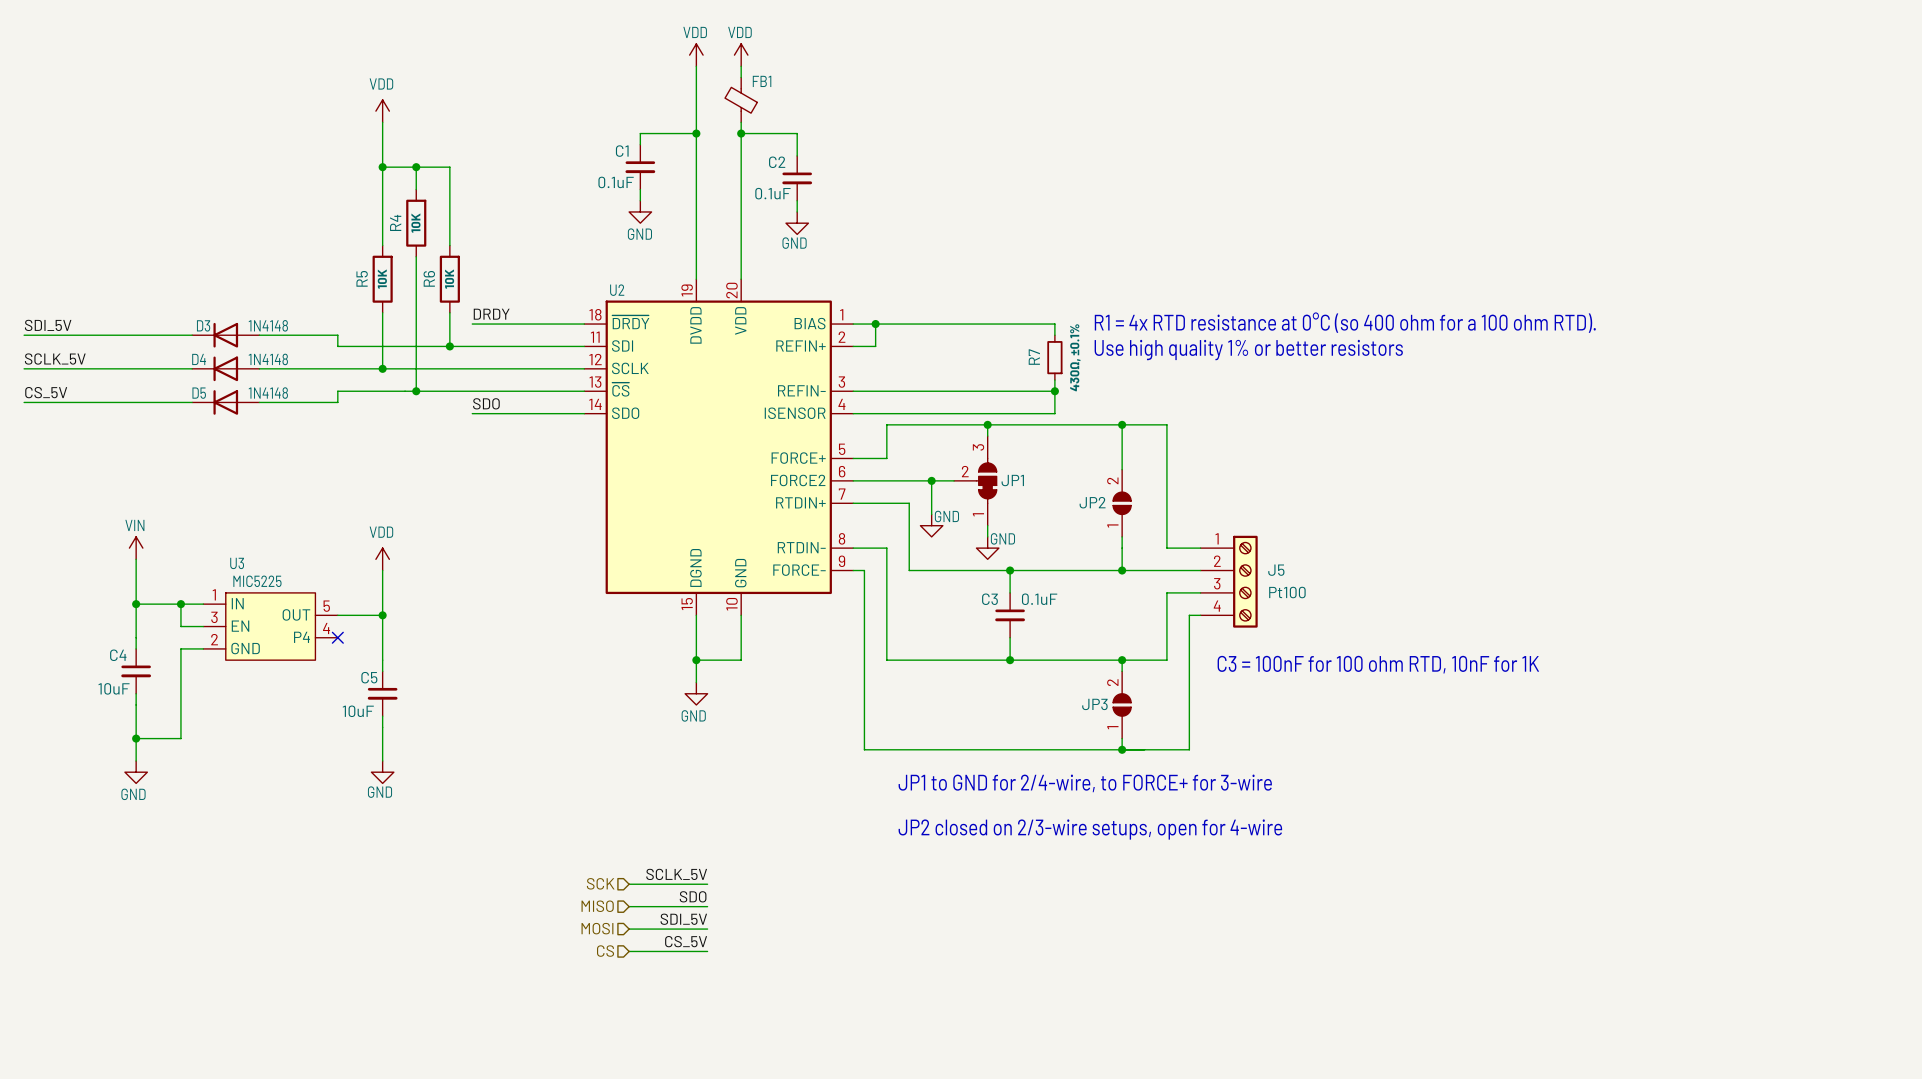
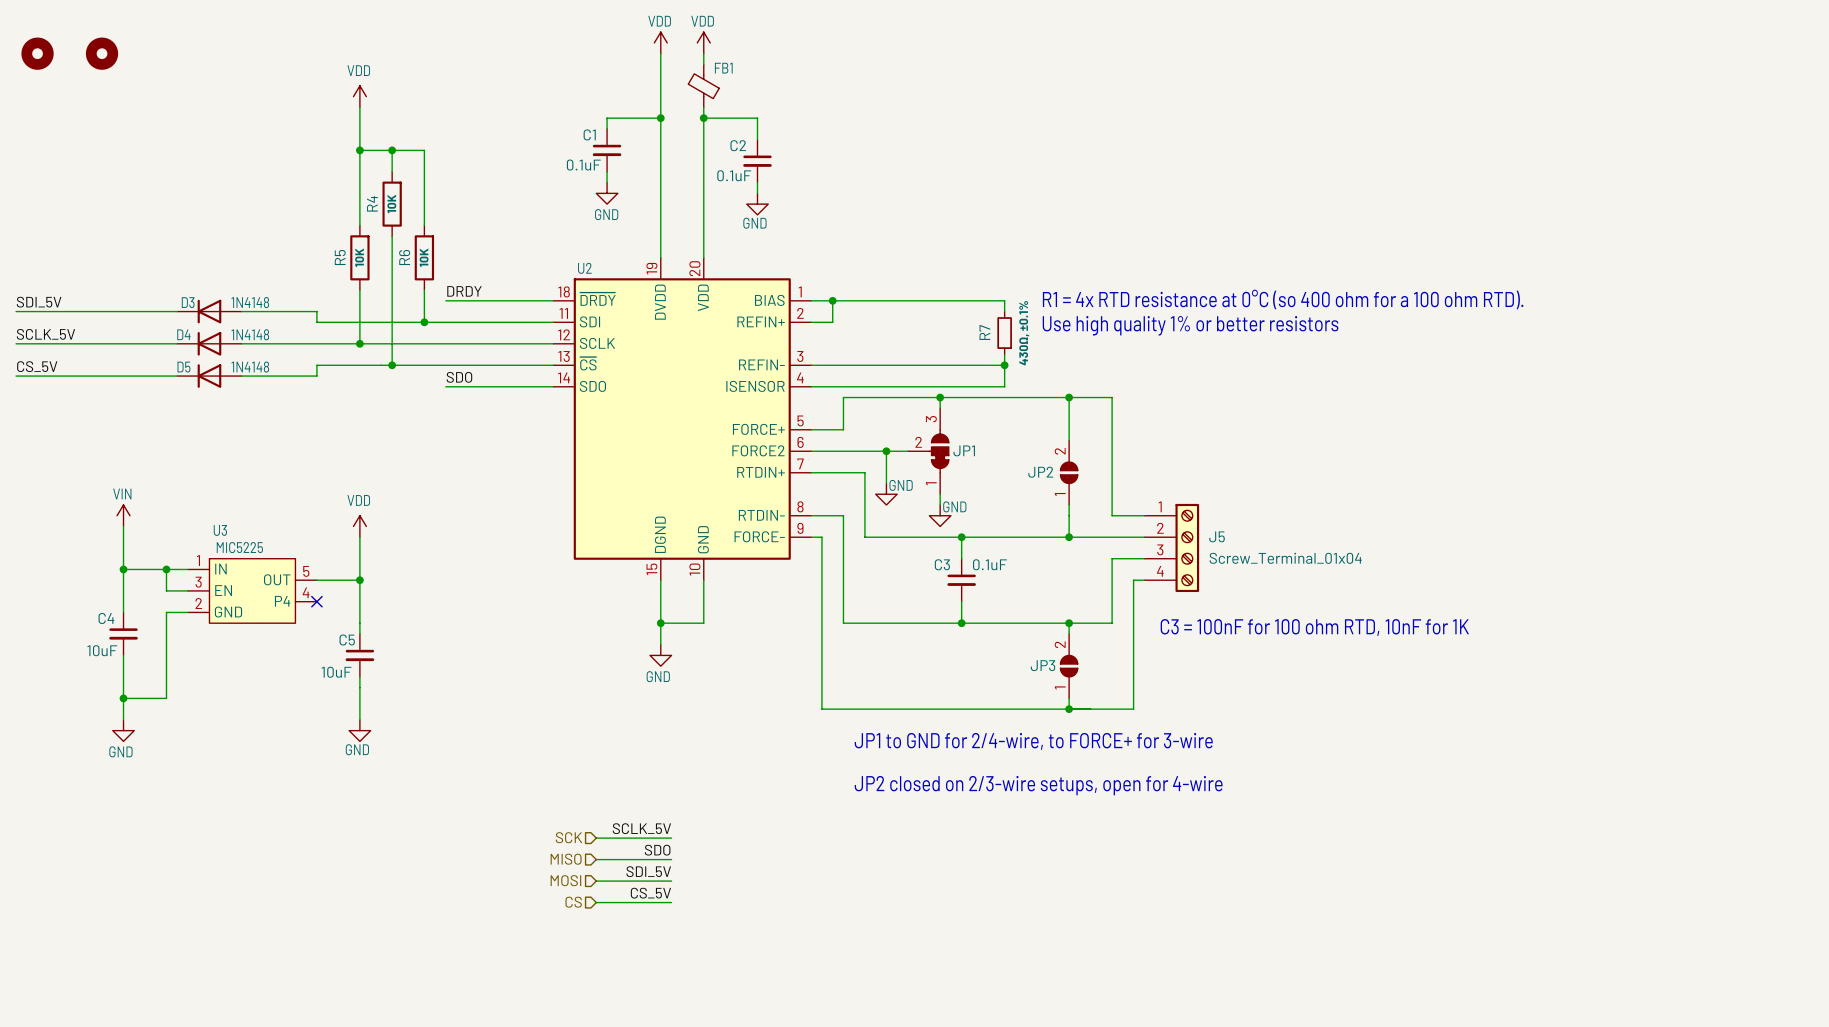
part: none -> (37, 53)
part: none -> (102, 53)
J5 value: Pt100 (1287, 592) -> Screw_Terminal_01x04 (1285, 558)

